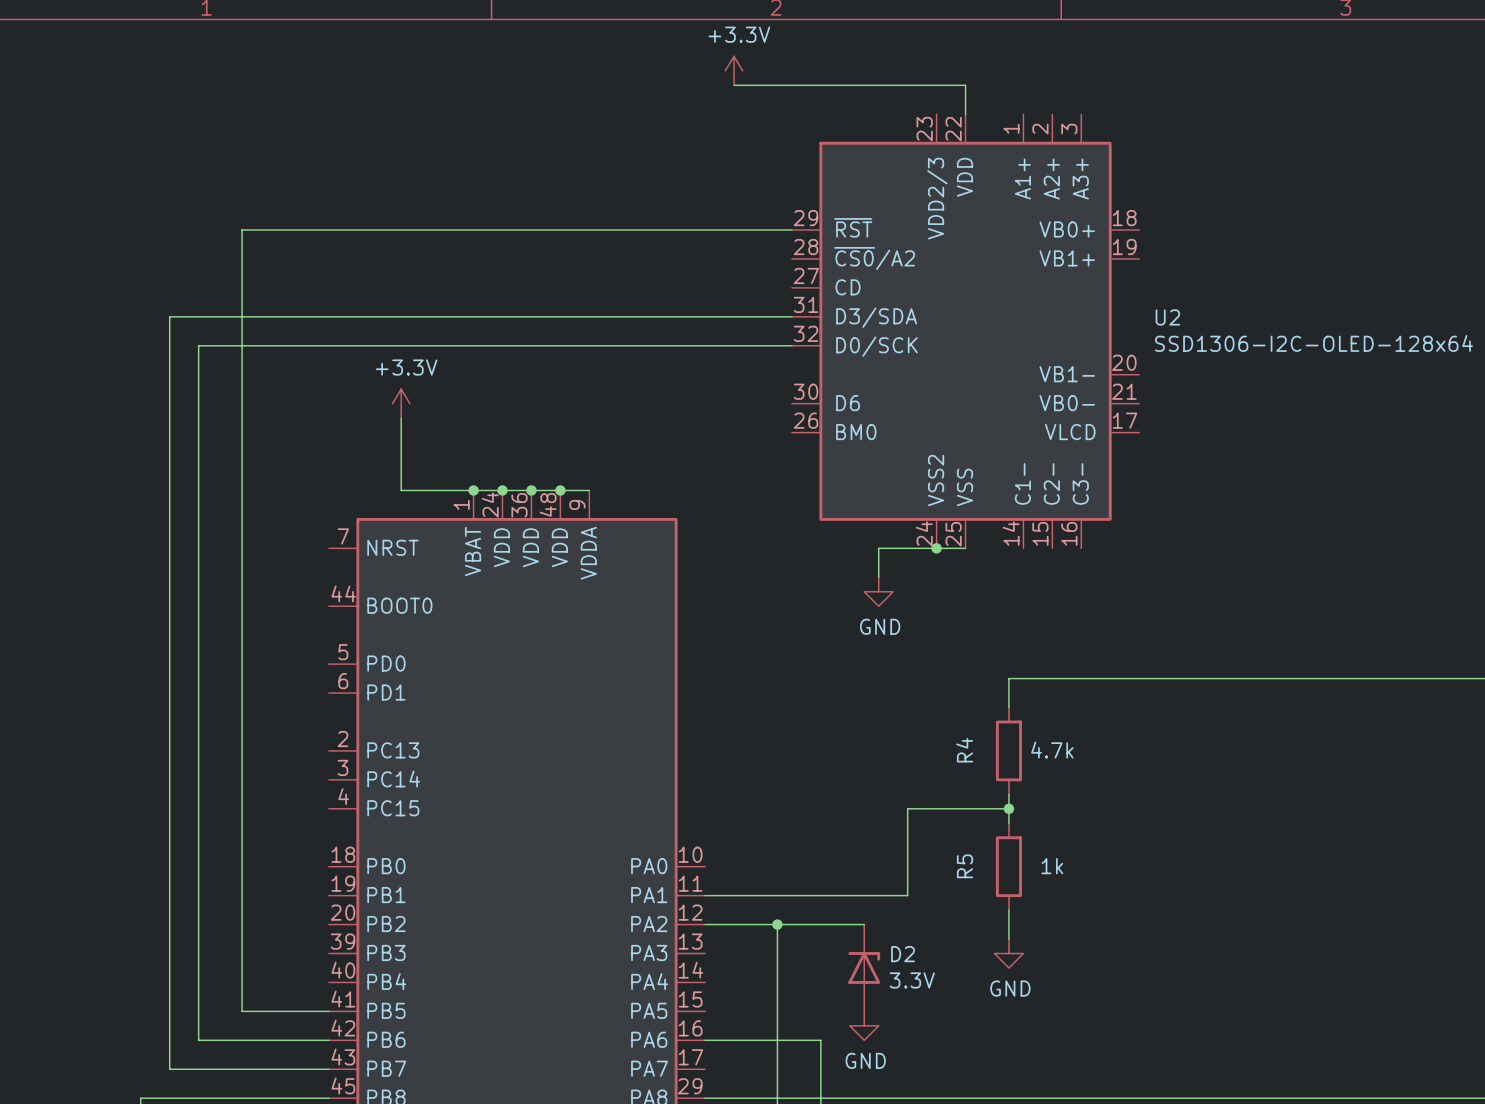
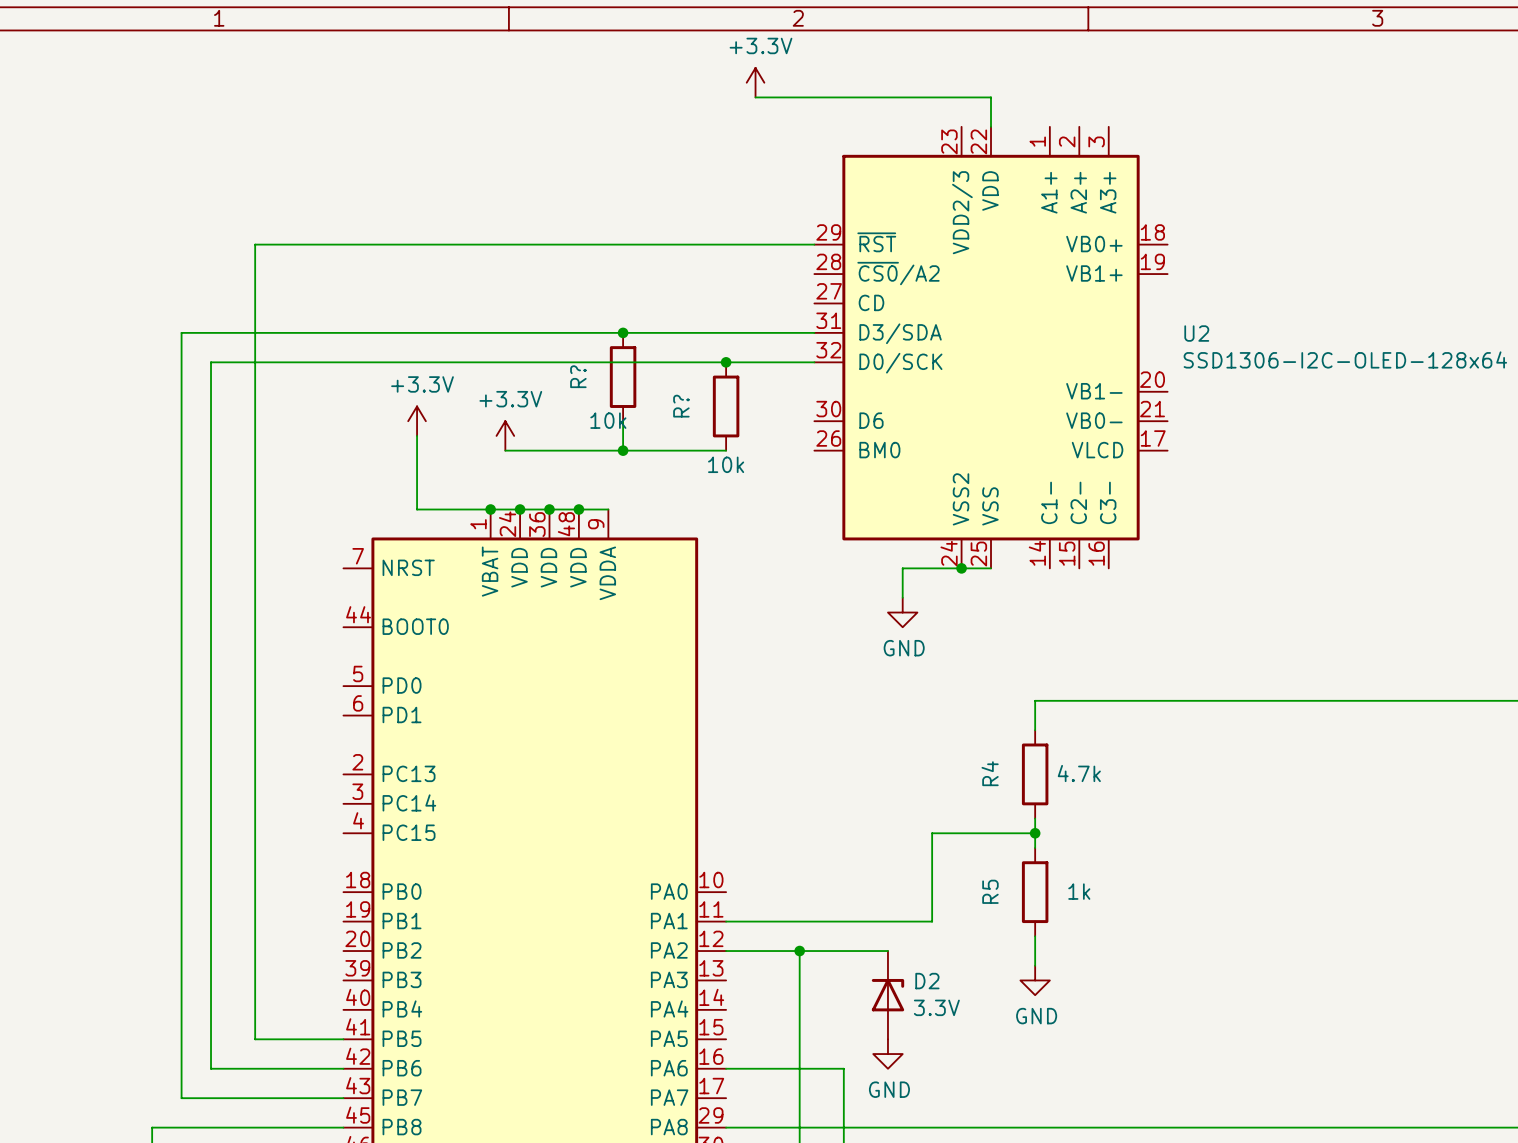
junction: none -> (623, 332)
junction: none -> (726, 362)
R?: none -> 10k (623, 377)
R?: none -> 10k (726, 406)
wire: none -> (623, 421) (623, 450)
power symbol: none -> +3.3V (505, 435)
wire: none -> (505, 450) (726, 450)
junction: none -> (623, 450)

